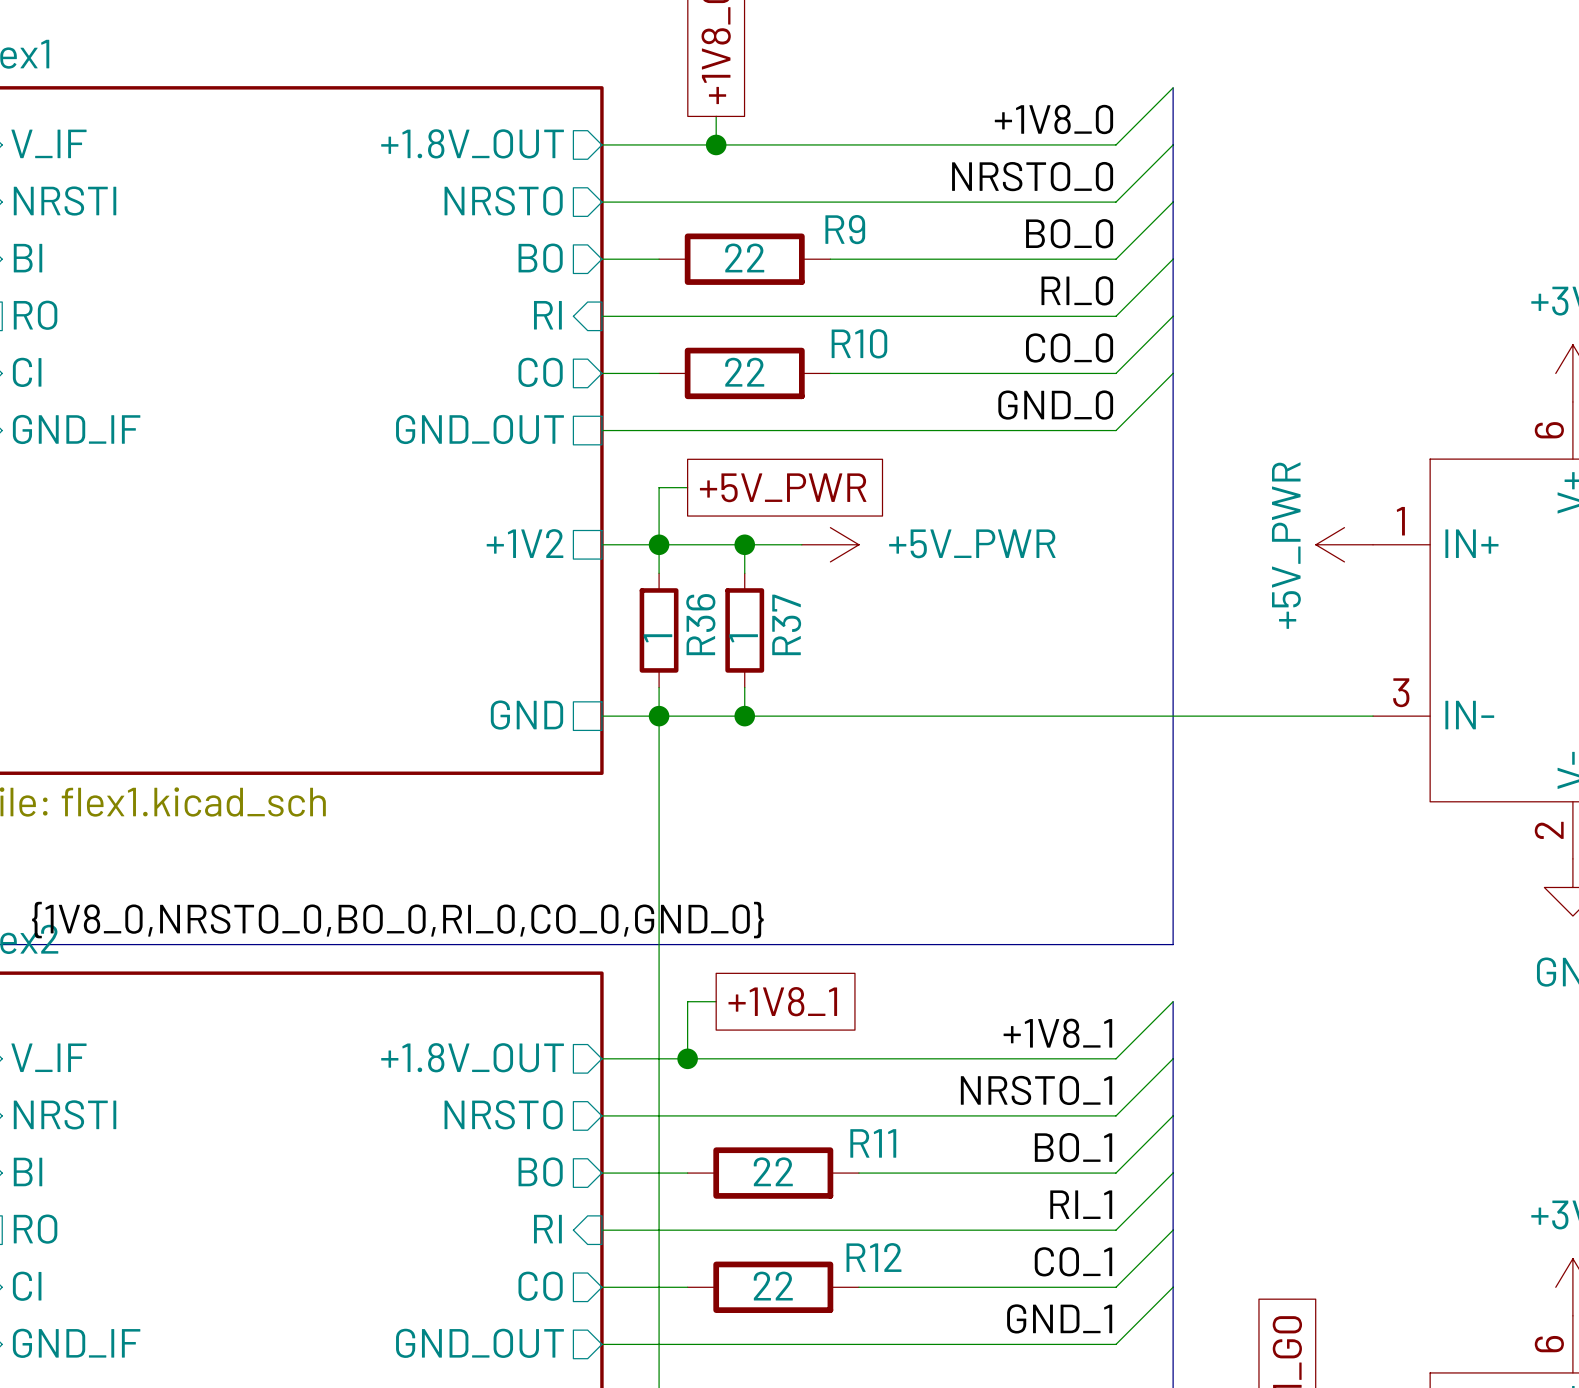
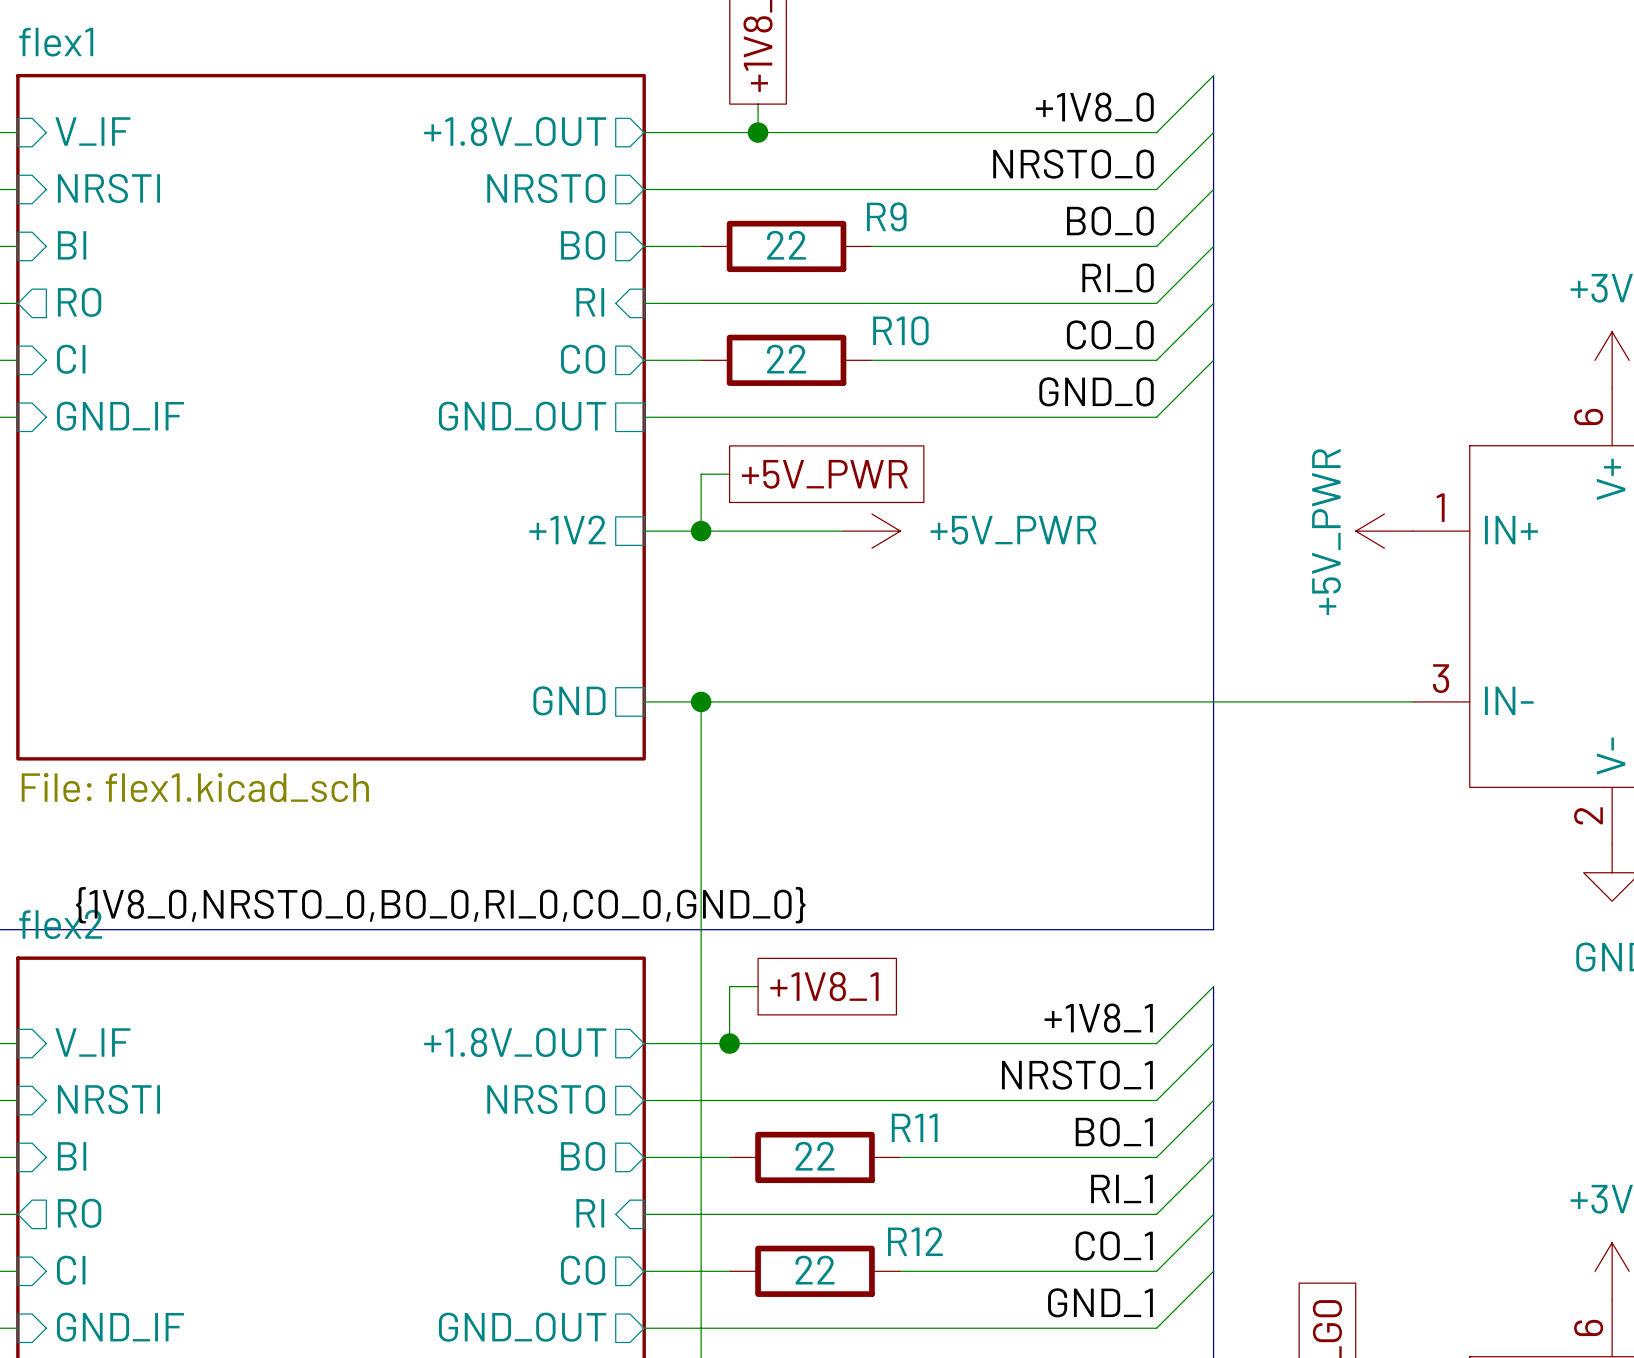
wire: (659, 544) (659, 573) -> none
wire: (744, 544) (744, 573) -> none
junction: (744, 544) -> none
R36: 1 (659, 630) -> none
R37: 1 (744, 630) -> none
wire: (659, 687) (659, 716) -> none
wire: (744, 687) (744, 716) -> none
junction: (744, 716) -> none

